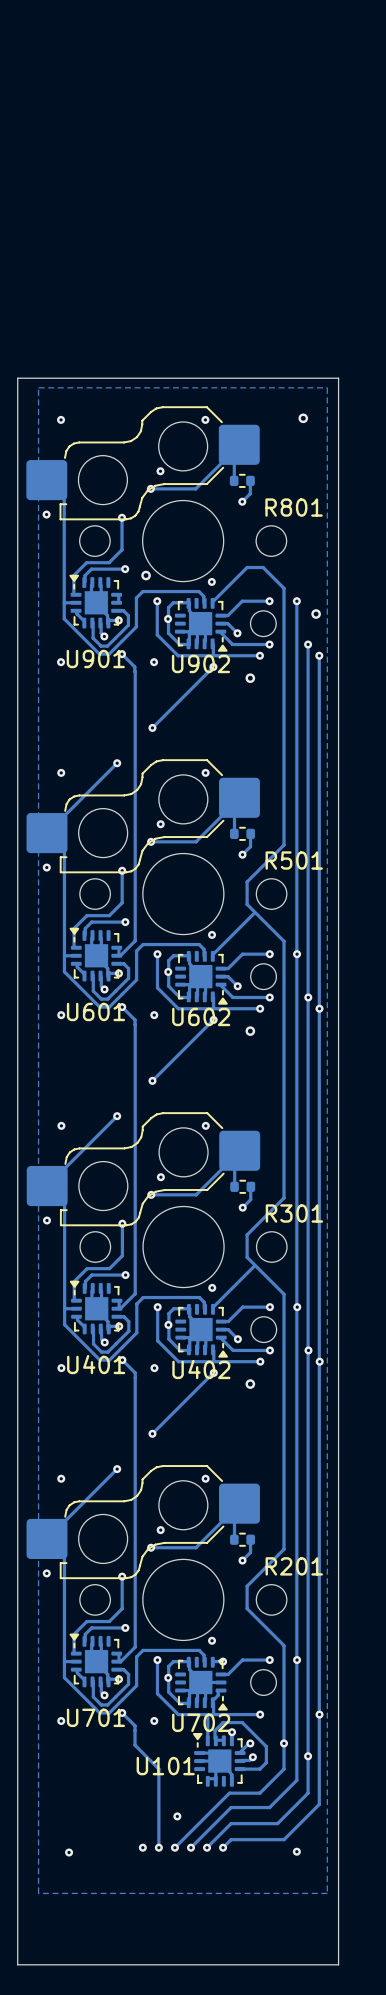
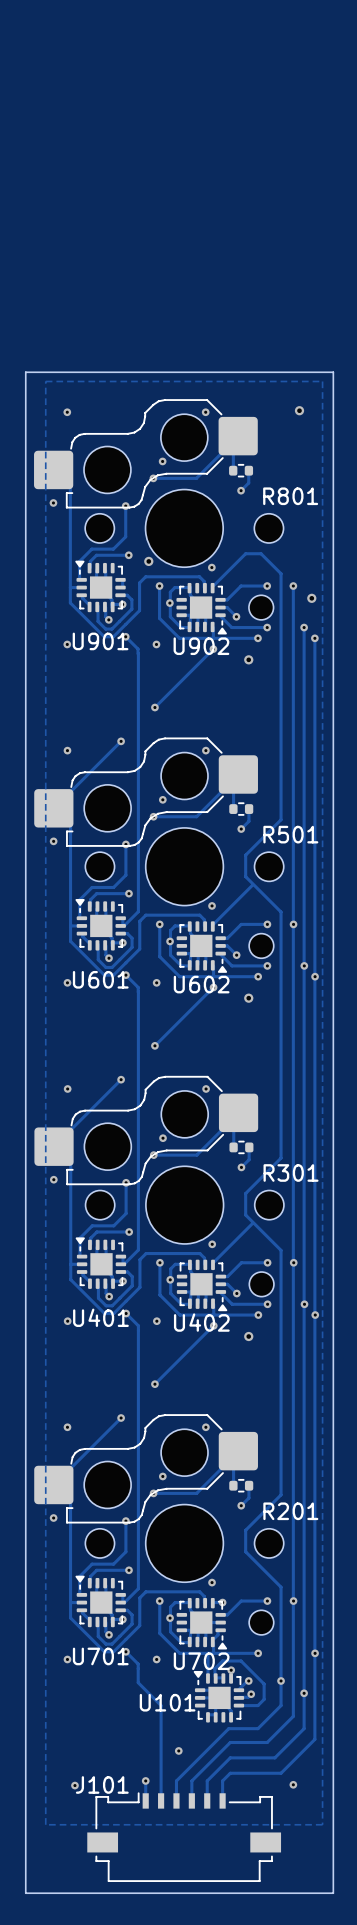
track: none -> (145, 1780) (145, 1794)
track: none -> (161, 1780) (161, 1796)
via: (158, 1847) -> none
track: none -> (176, 1780) (176, 1796)
via: (174, 1847) -> none
track: none -> (191, 1780) (191, 1796)
via: (190, 1847) -> none
track: none -> (207, 1780) (207, 1794)
via: (207, 1847) -> none
track: none -> (222, 1780) (222, 1794)
via: (223, 1847) -> none
J101: none -> (184, 1837)

